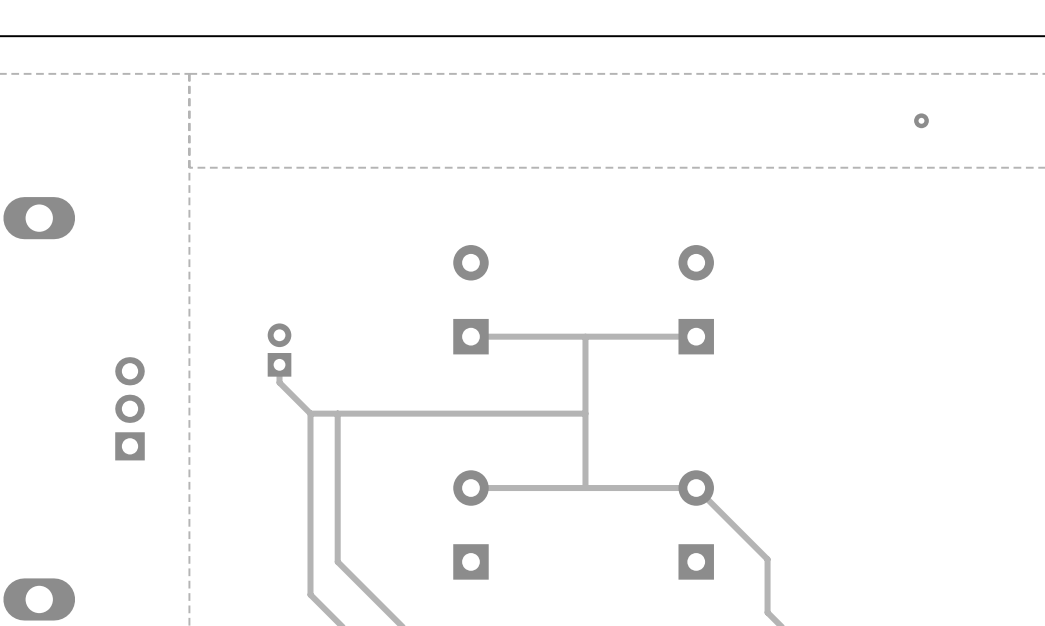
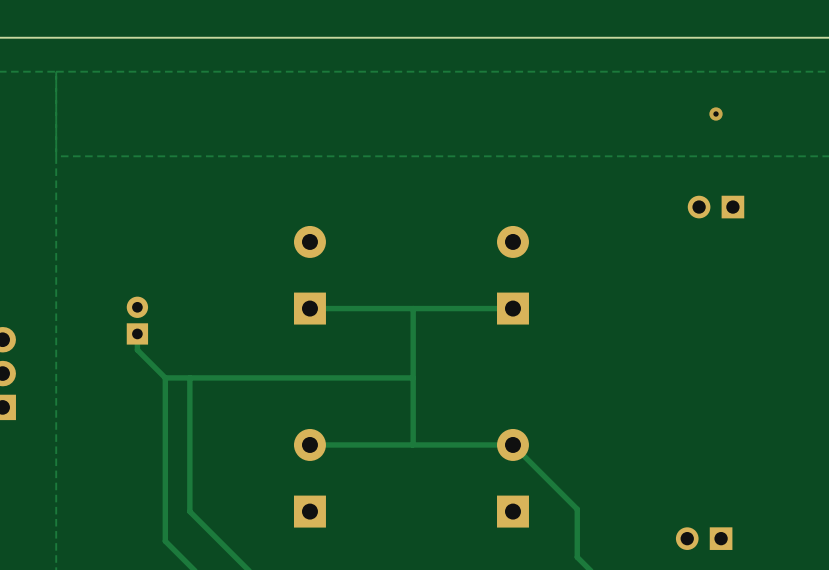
part: none -> (716, 207)
part: none -> (704, 538)

